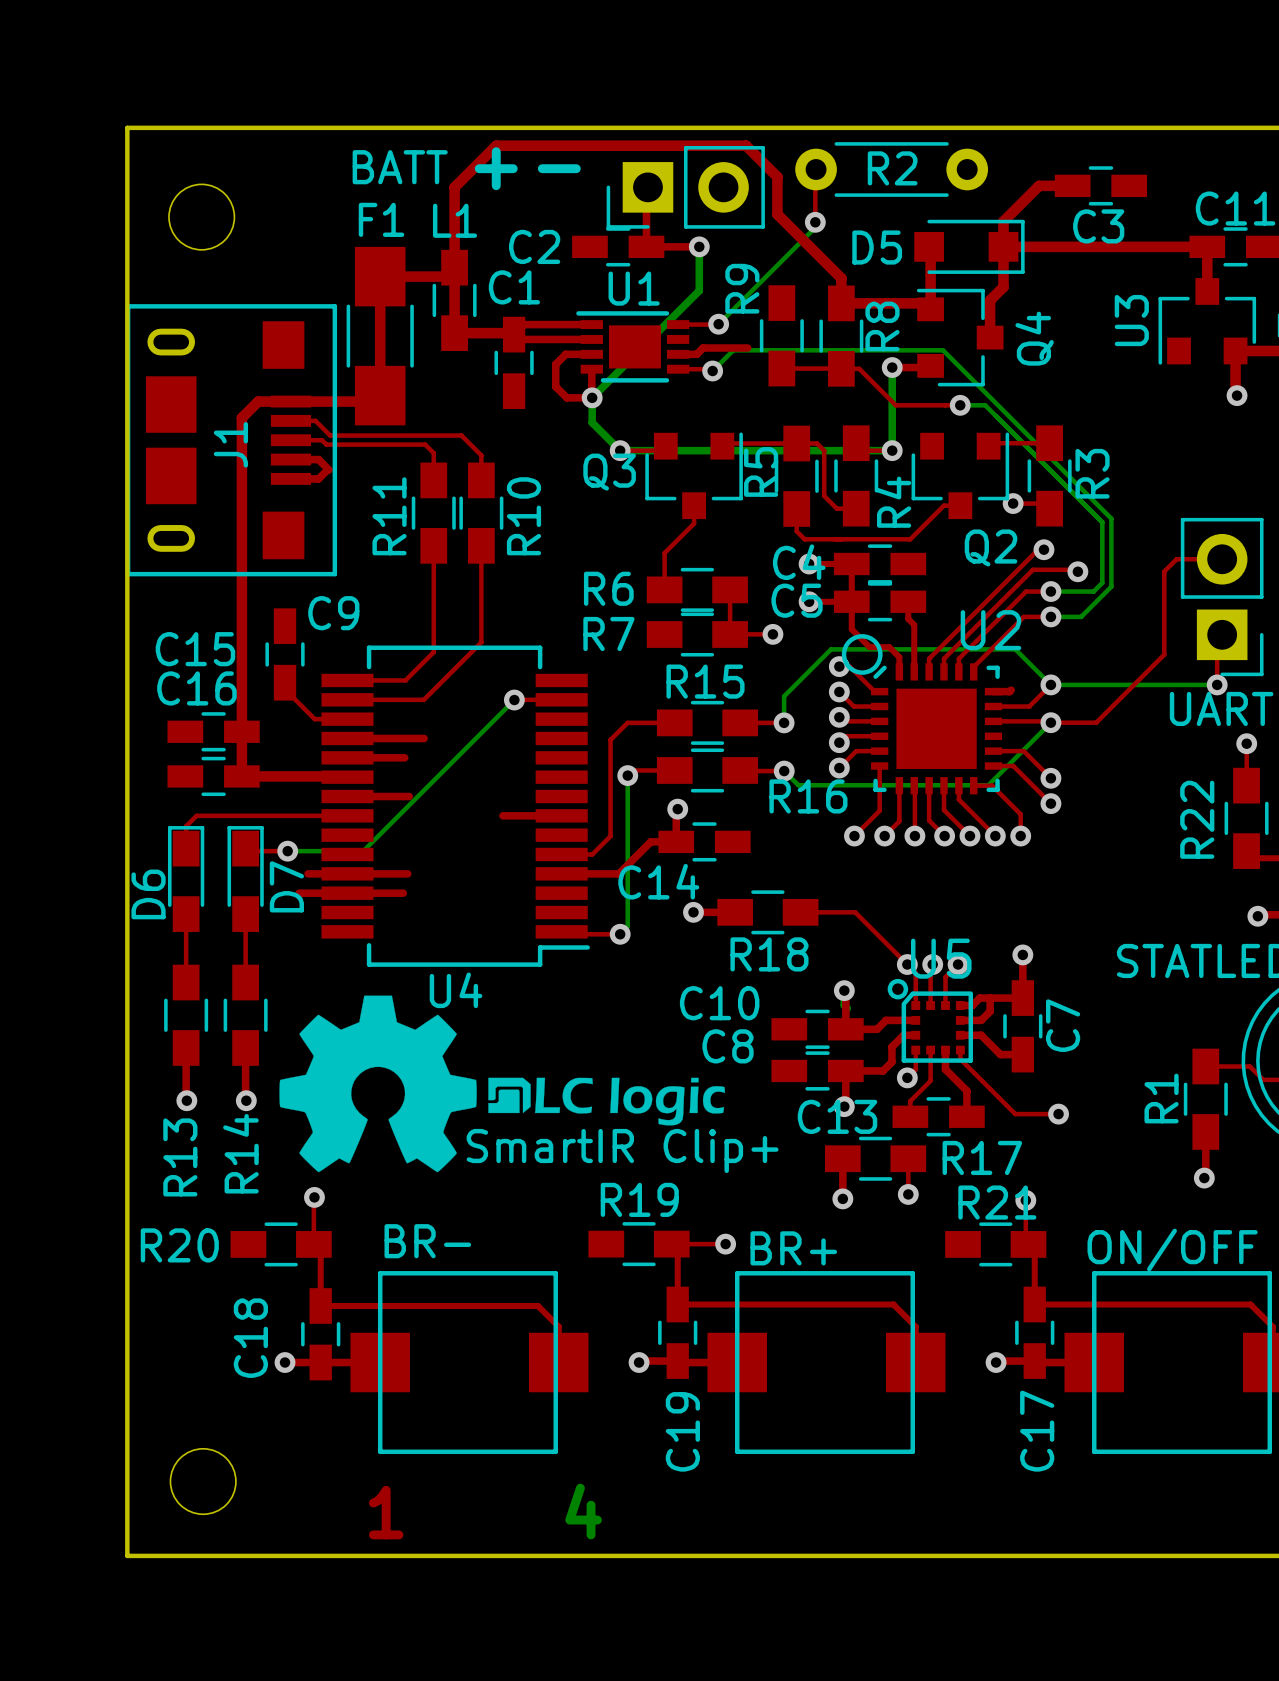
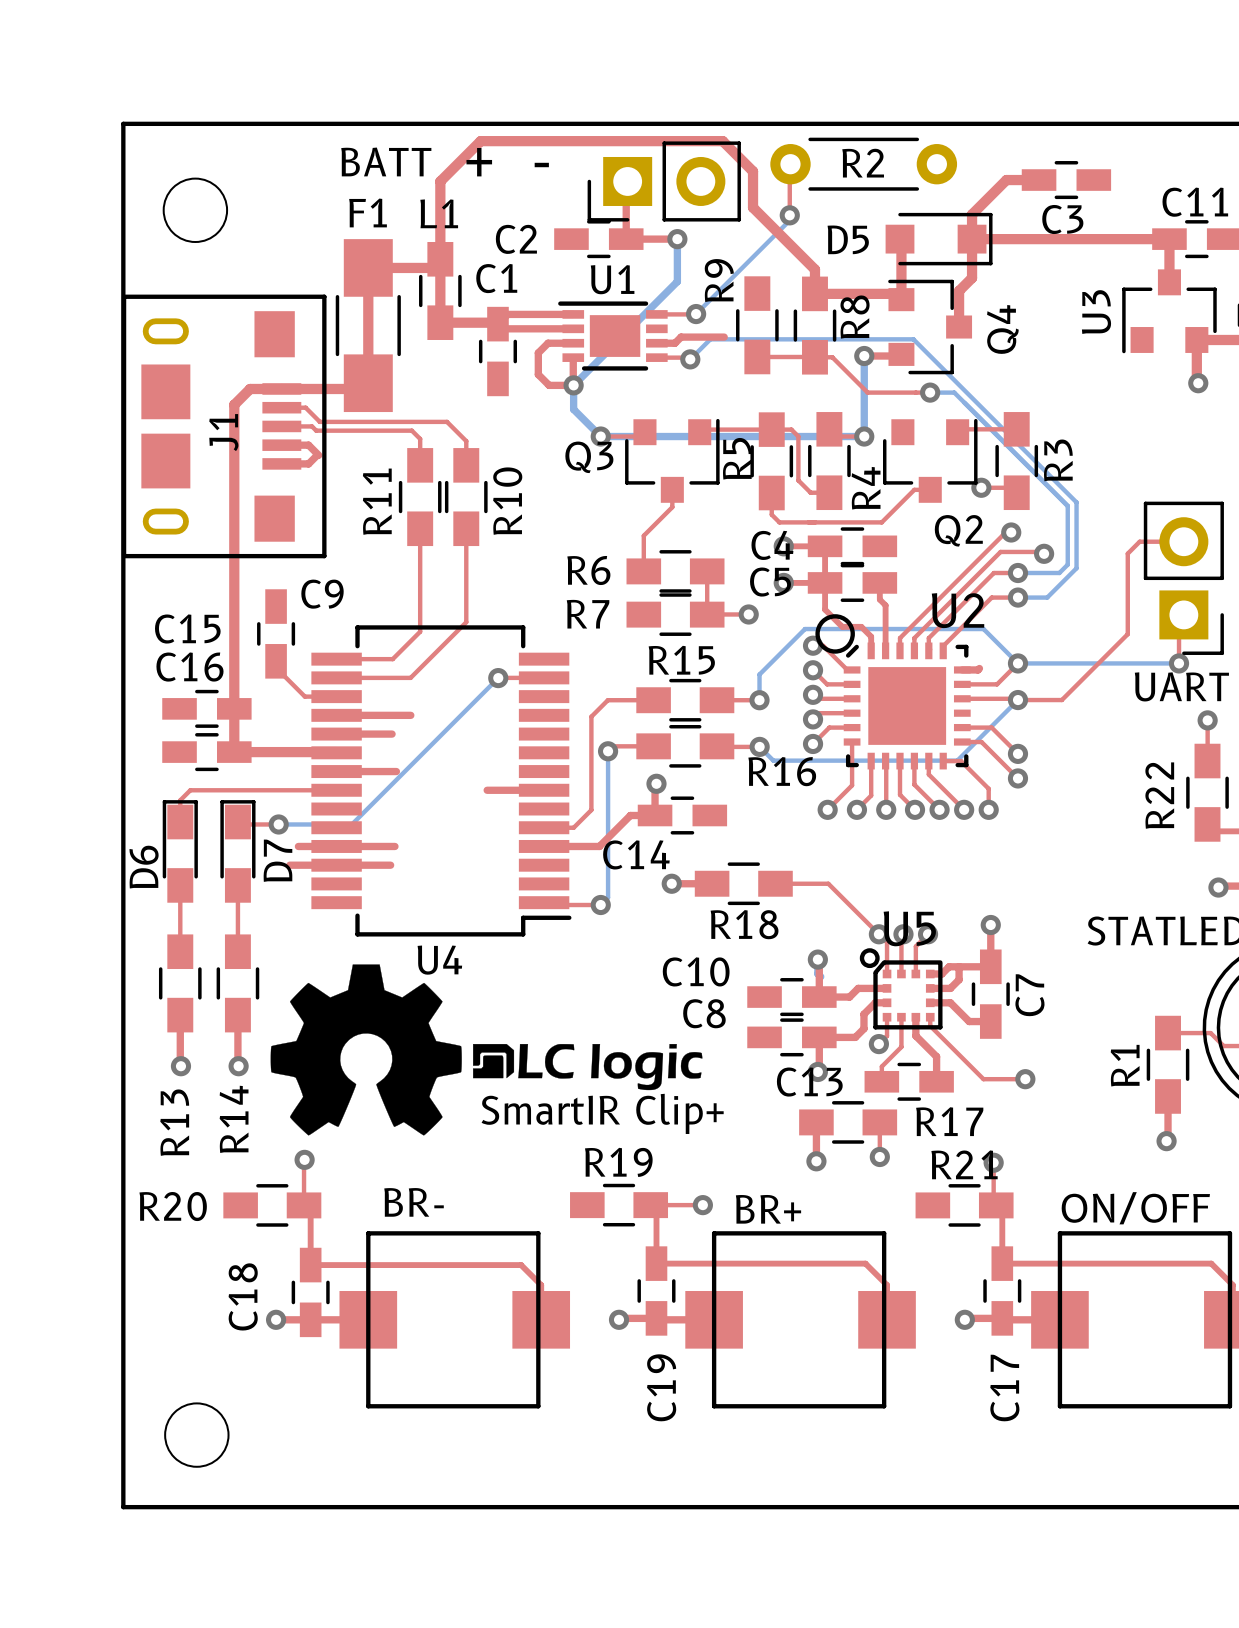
text: 4 (583, 1511) -> none
text: 1 (386, 1512) -> none

